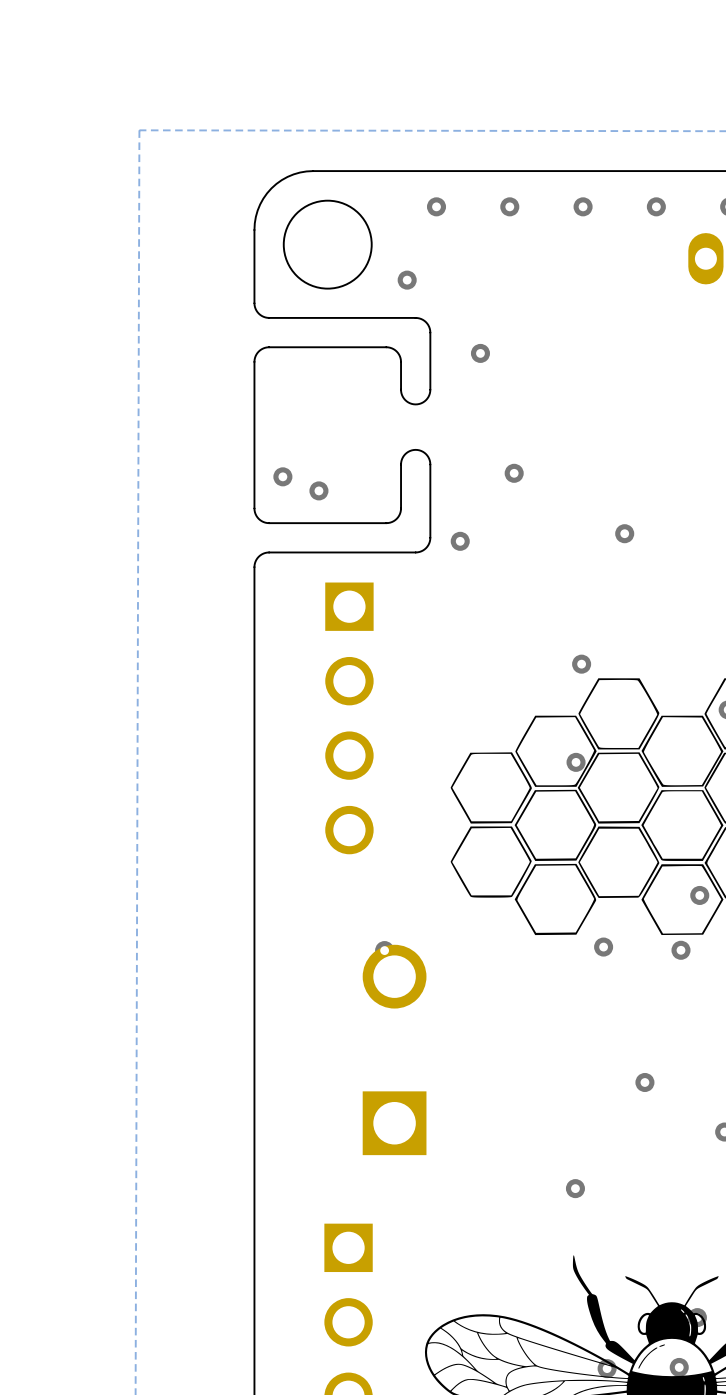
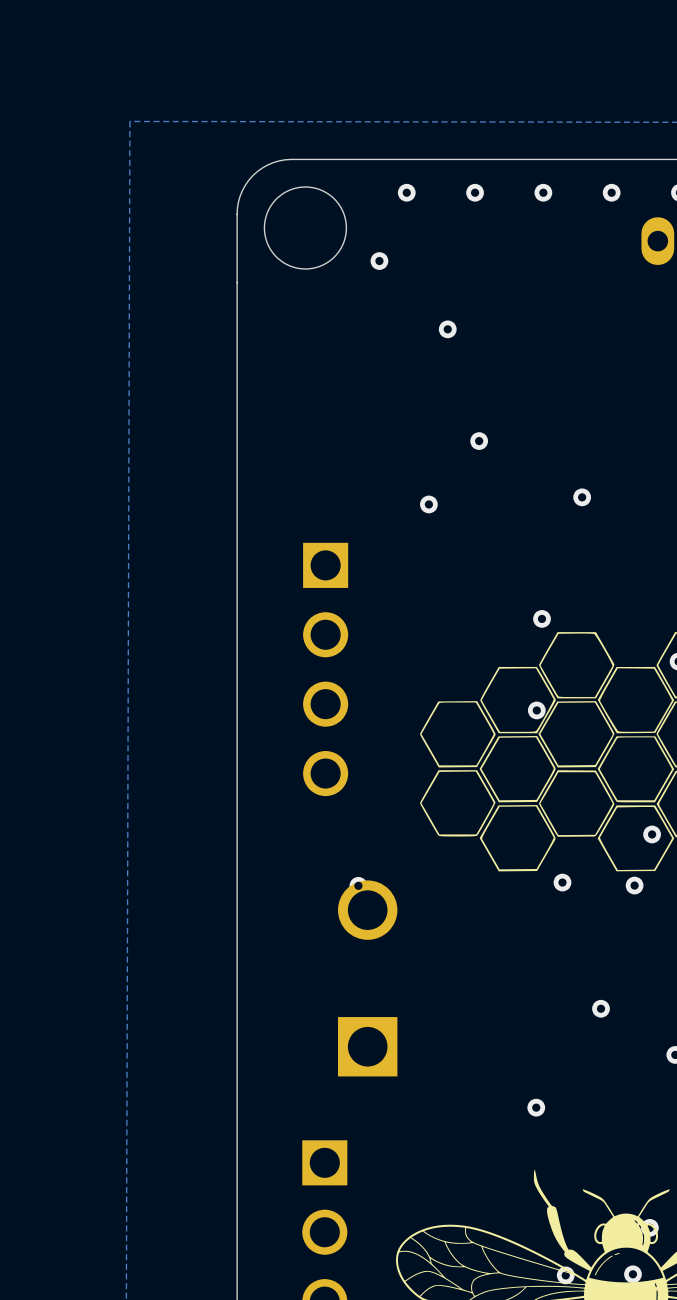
board edge: (254, 303) (258, 313) (267, 317) (415, 317) (423, 319) (430, 330) (430, 391) (426, 400) (419, 403) (411, 403) (405, 400) (401, 391) (400, 358) (396, 351) (388, 347) (267, 347) (258, 351) (254, 361) -> (237, 282) (237, 337)
via: (282, 476) -> none
via: (318, 490) -> none
board edge: (254, 508) (257, 517) (267, 523) (390, 522) (396, 518) (400, 510) (401, 464) (402, 457) (410, 450) (417, 449) (424, 452) (429, 460) (430, 539) (423, 550) (415, 552) (267, 552) (257, 558) (254, 567) -> (237, 473) (237, 528)

